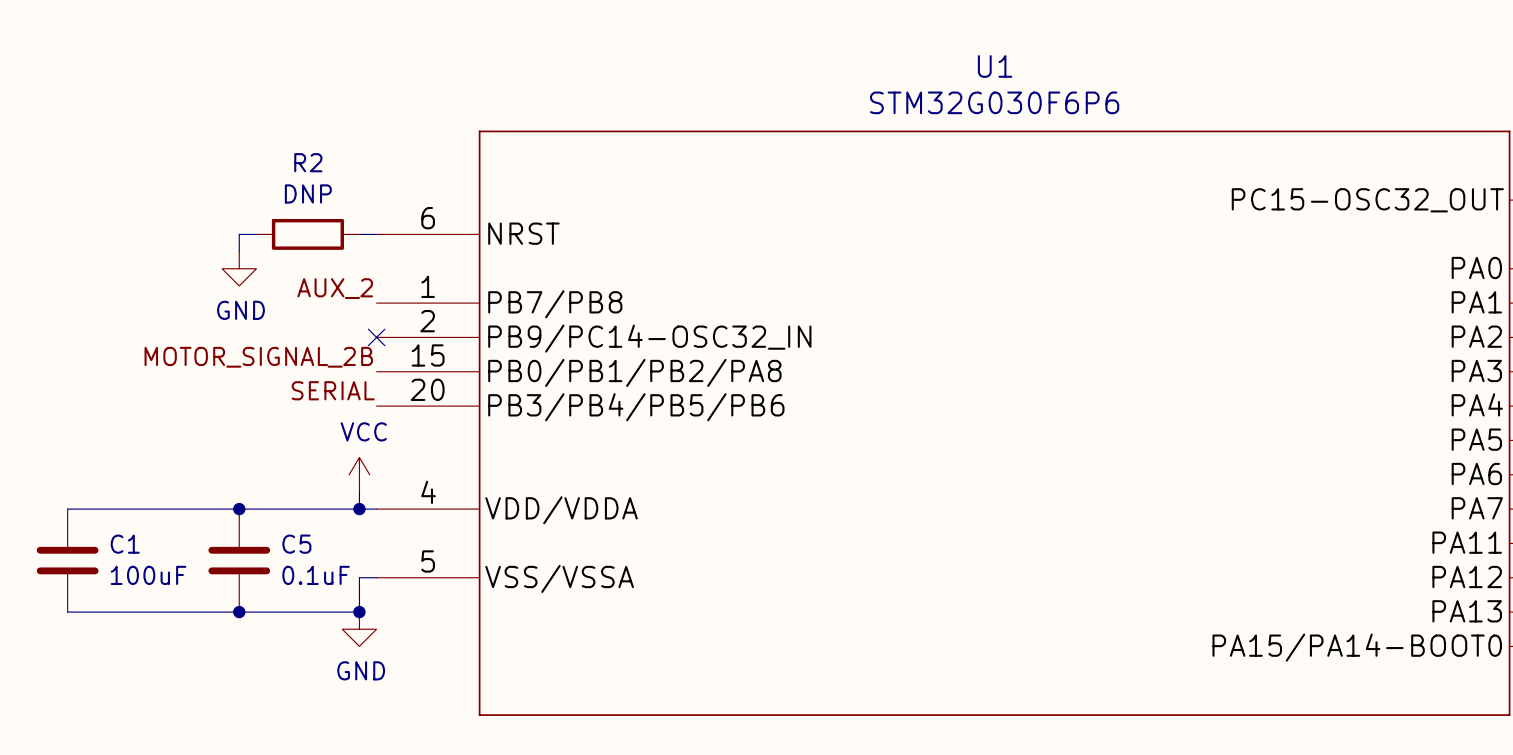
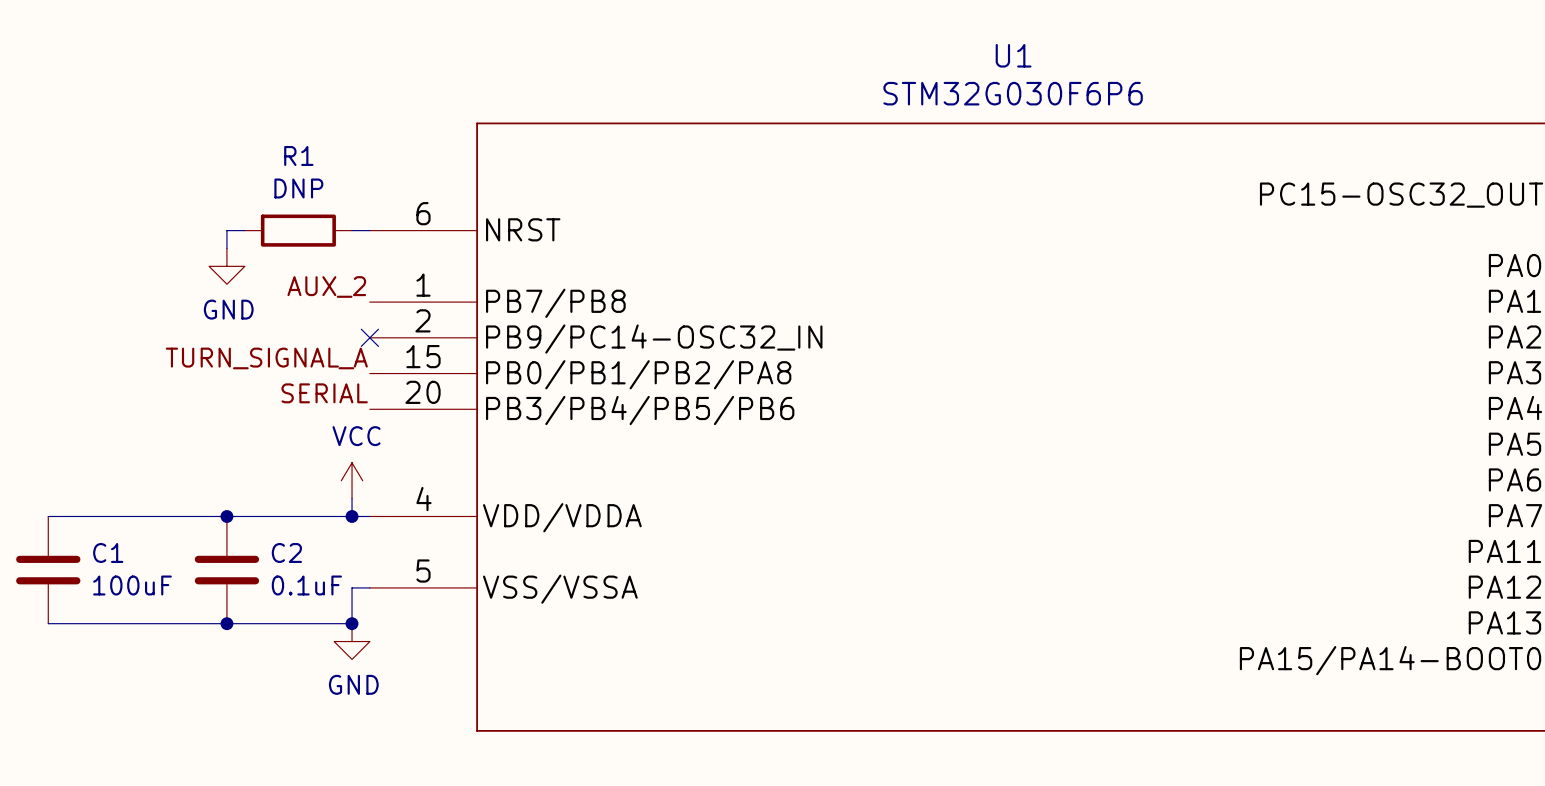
R2 name: R2 (308, 162) -> R1 (298, 155)
label: MOTOR_SIGNAL_2B (258, 357) -> TURN_SIGNAL_A (266, 358)
C5 name: C5 (296, 544) -> C2 (286, 552)

